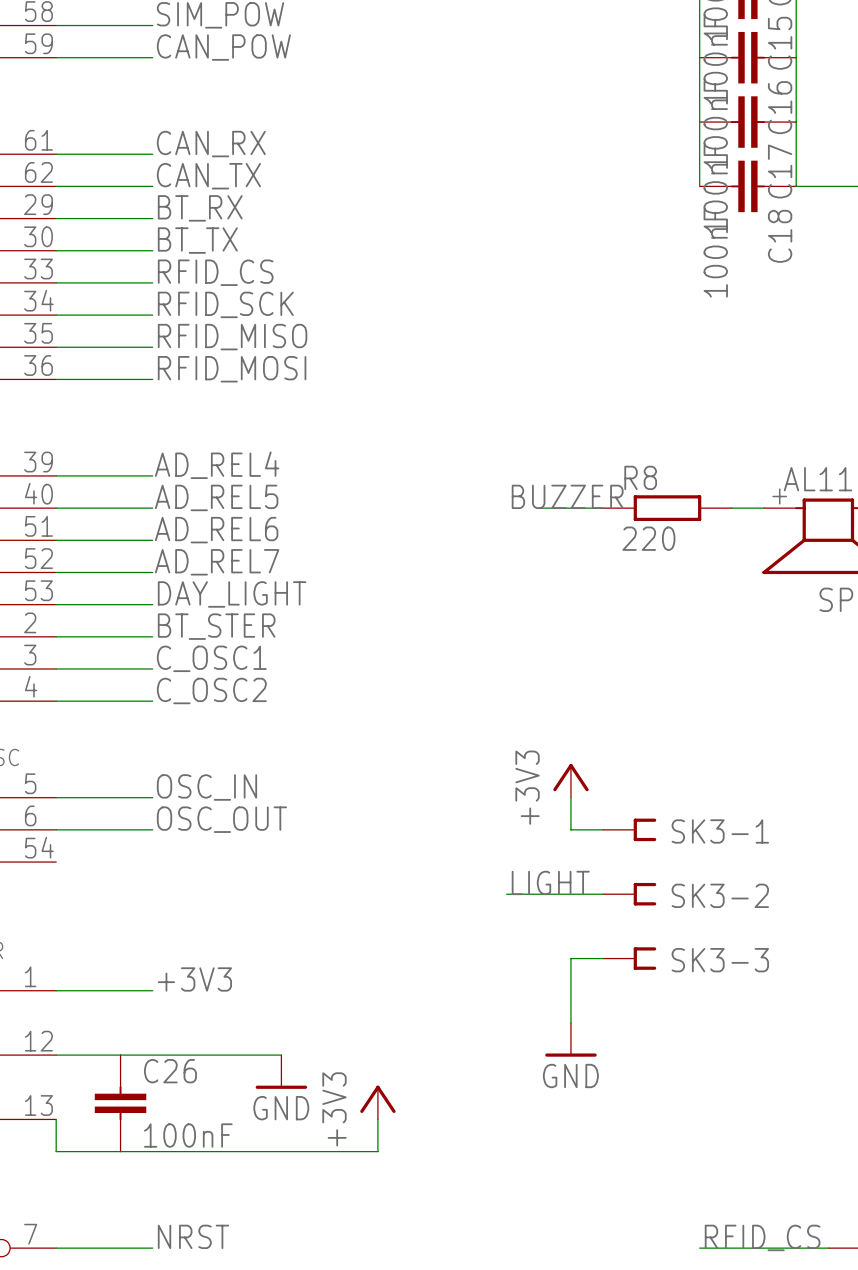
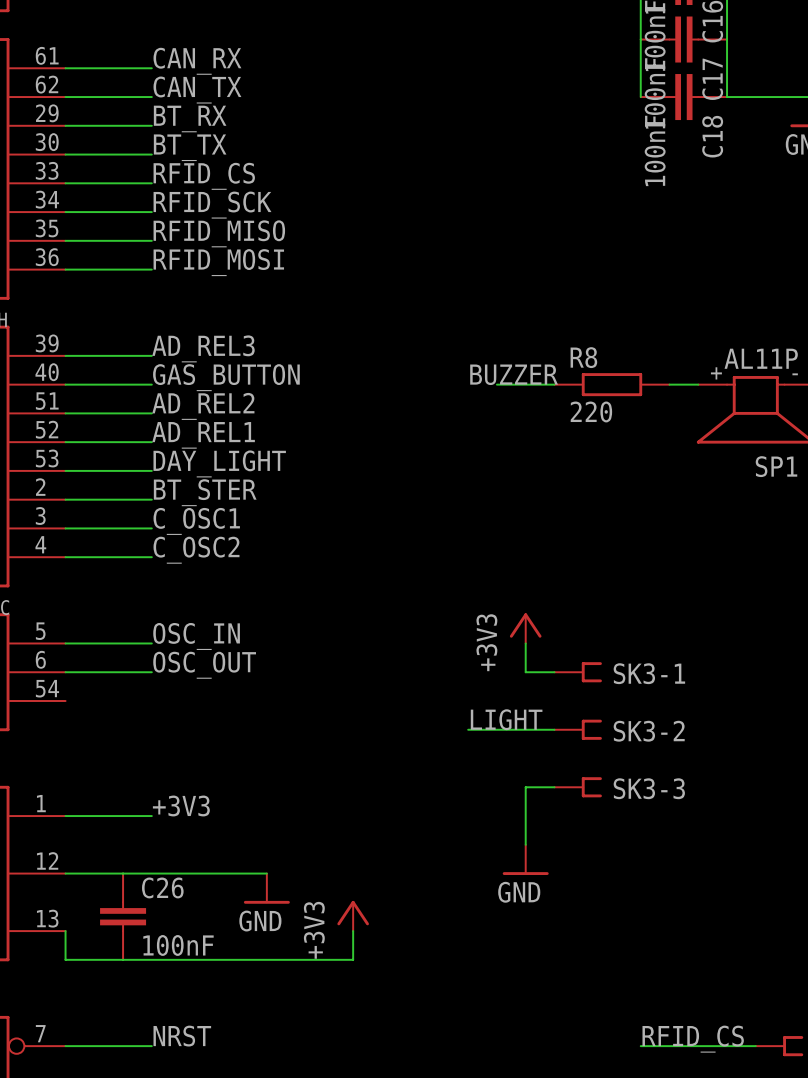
label: AD_REL4 (217, 465) -> AD_REL3 (203, 348)
label: AD_REL5 (216, 497) -> GAS_BUTTON (226, 377)
label: AD_REL6 (216, 530) -> AD_REL2 (203, 406)
label: AD_REL7 (217, 562) -> AD_REL1 (203, 435)

